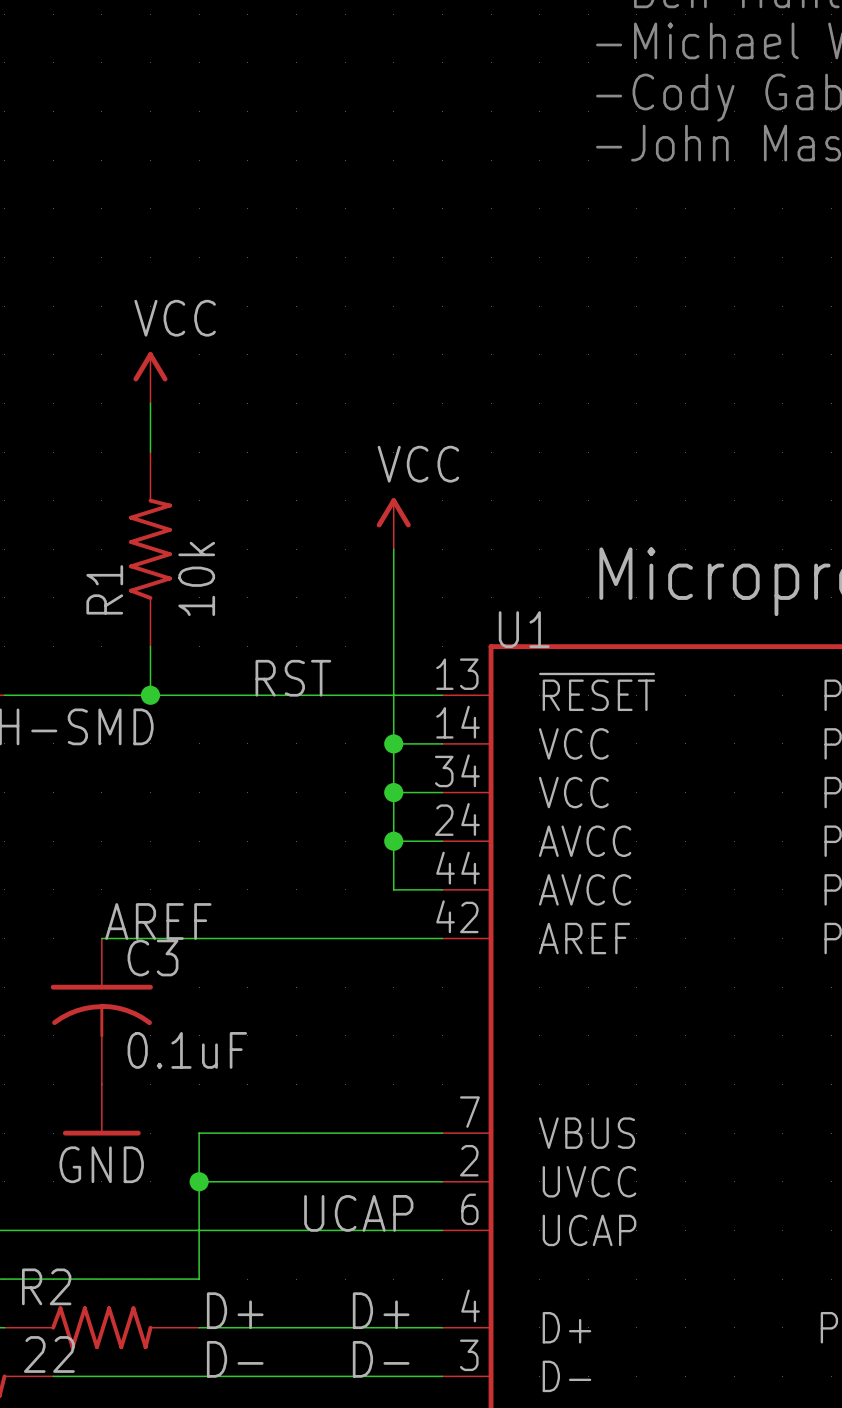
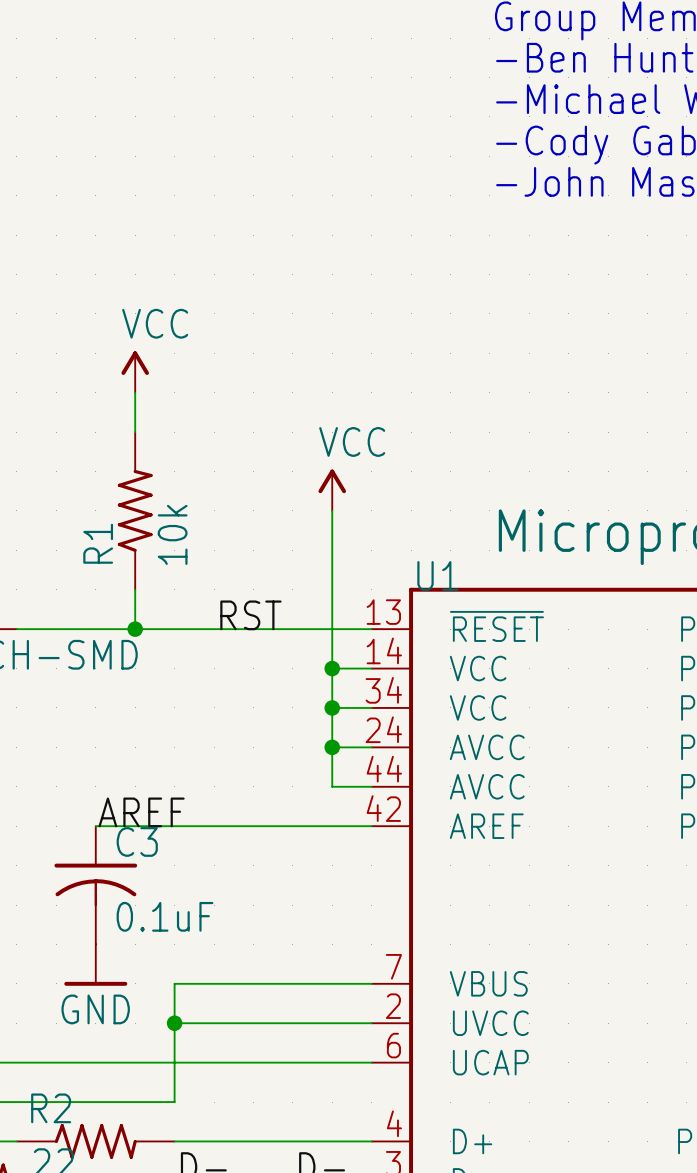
label: UCAP (358, 1213) -> none
label: D+ (235, 1310) -> none
label: D+ (381, 1310) -> none

